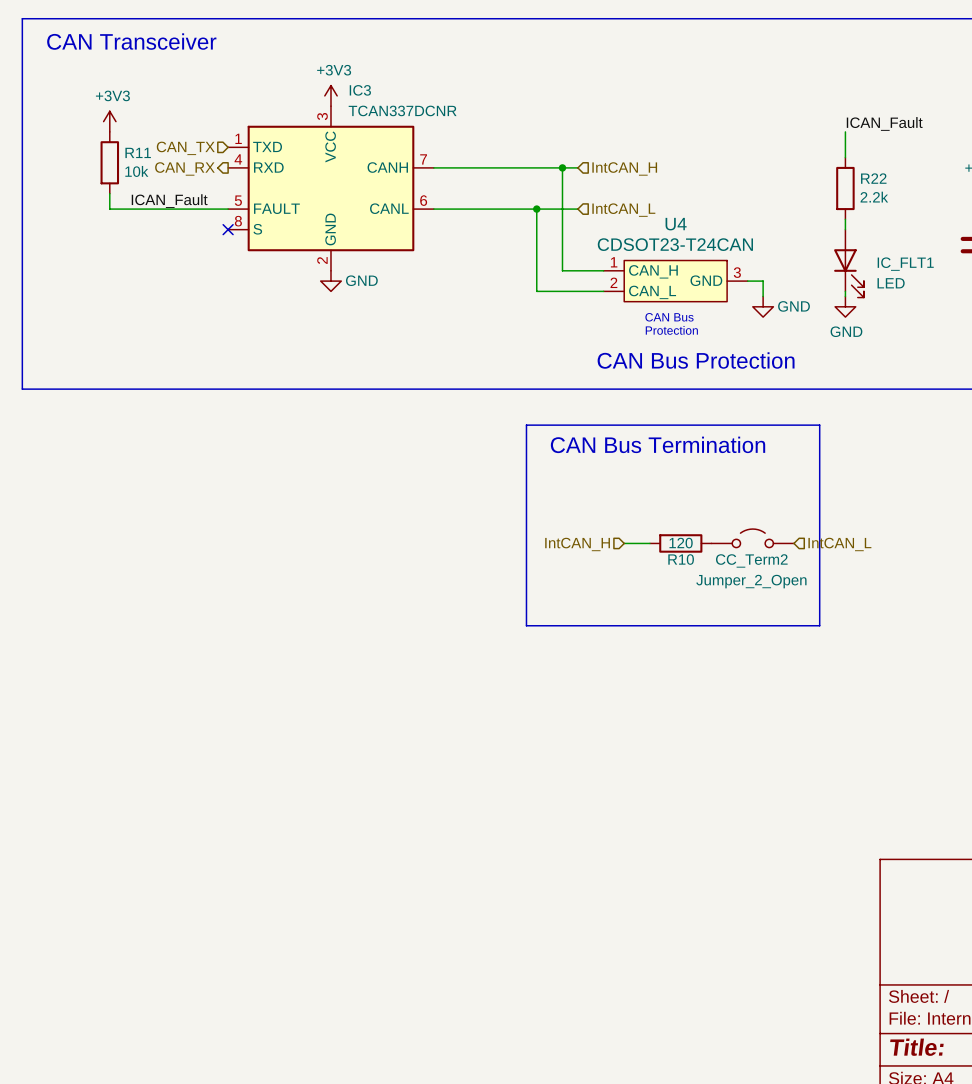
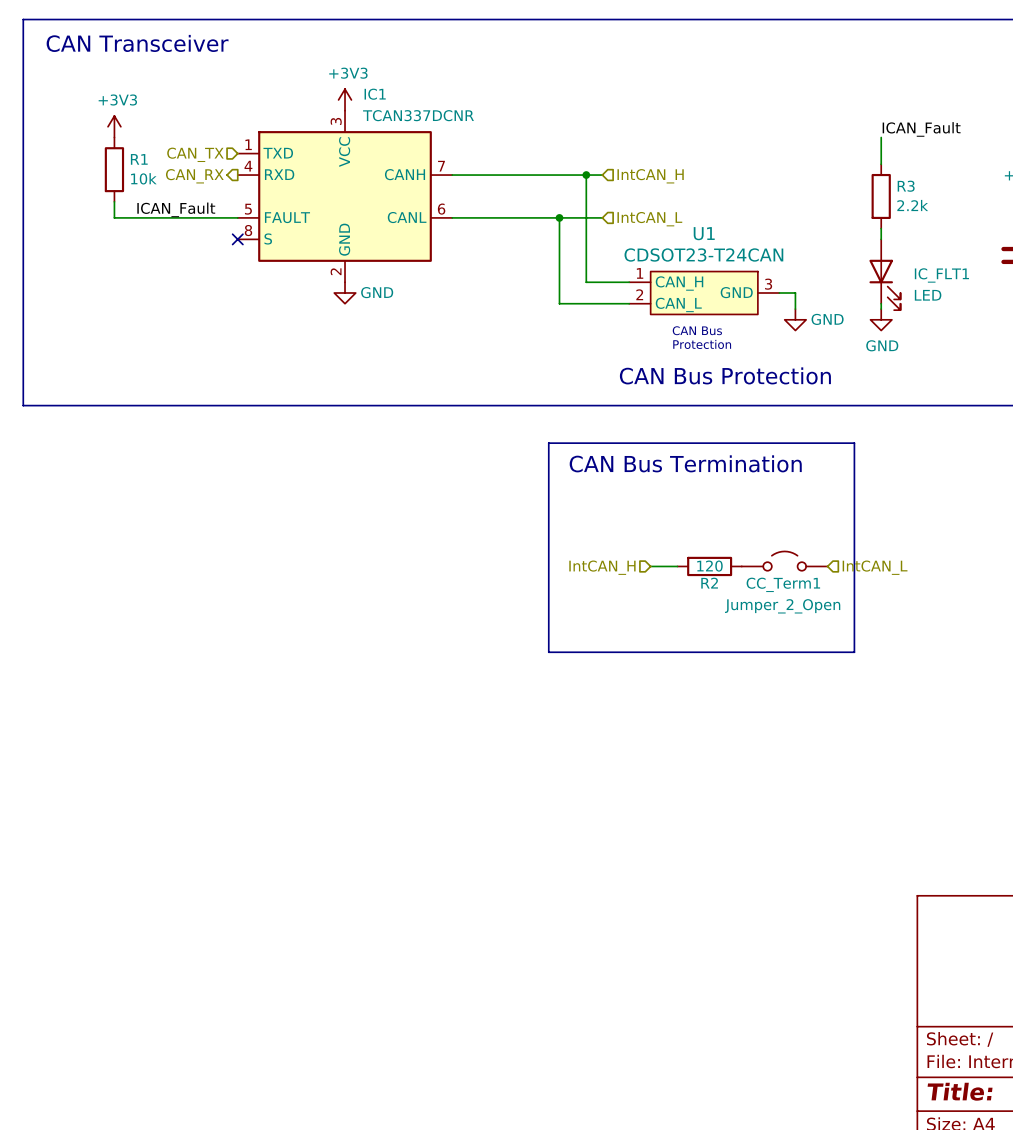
IC3 name: IC3 (360, 90) -> IC1 (375, 94)
R11 name: R11 (138, 152) -> R1 (139, 159)
R22 name: R22 (873, 178) -> R3 (906, 186)
U4 name: U4 (676, 224) -> U1 (704, 233)
R10 name: R10 (681, 559) -> R2 (709, 583)
CC_Term2 name: CC_Term2 (751, 560) -> CC_Term1 (783, 584)

